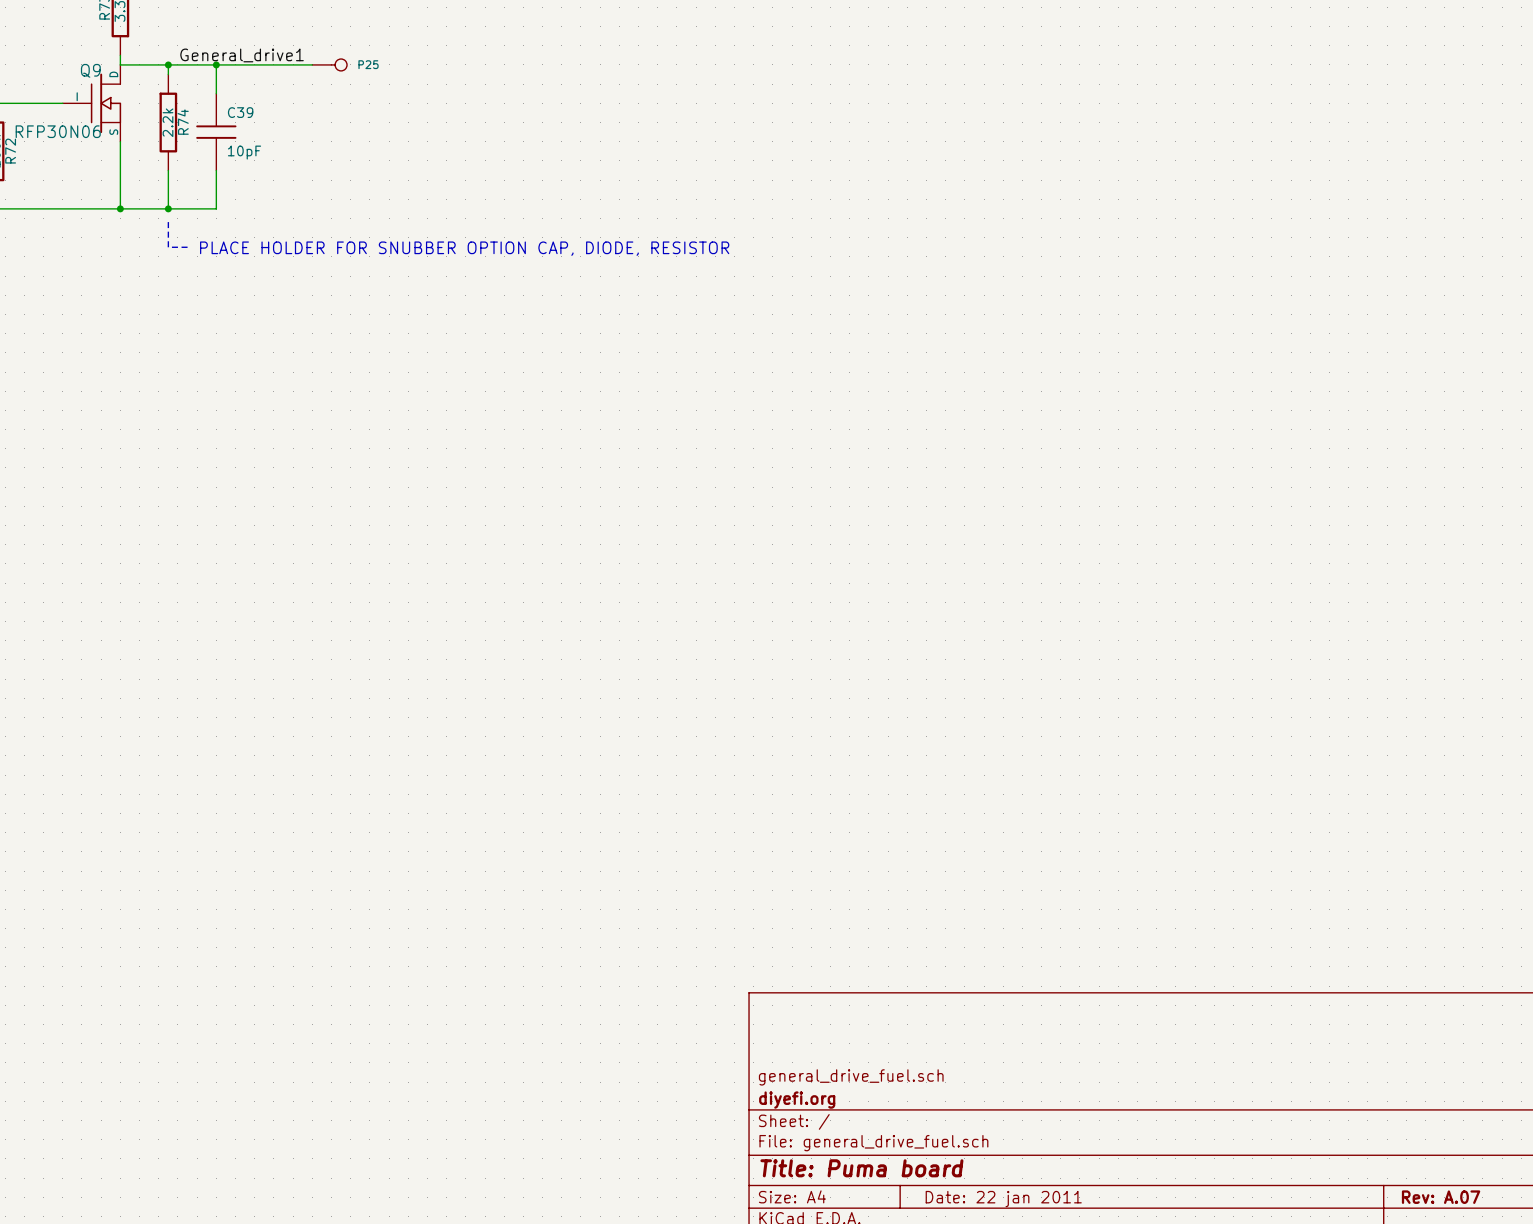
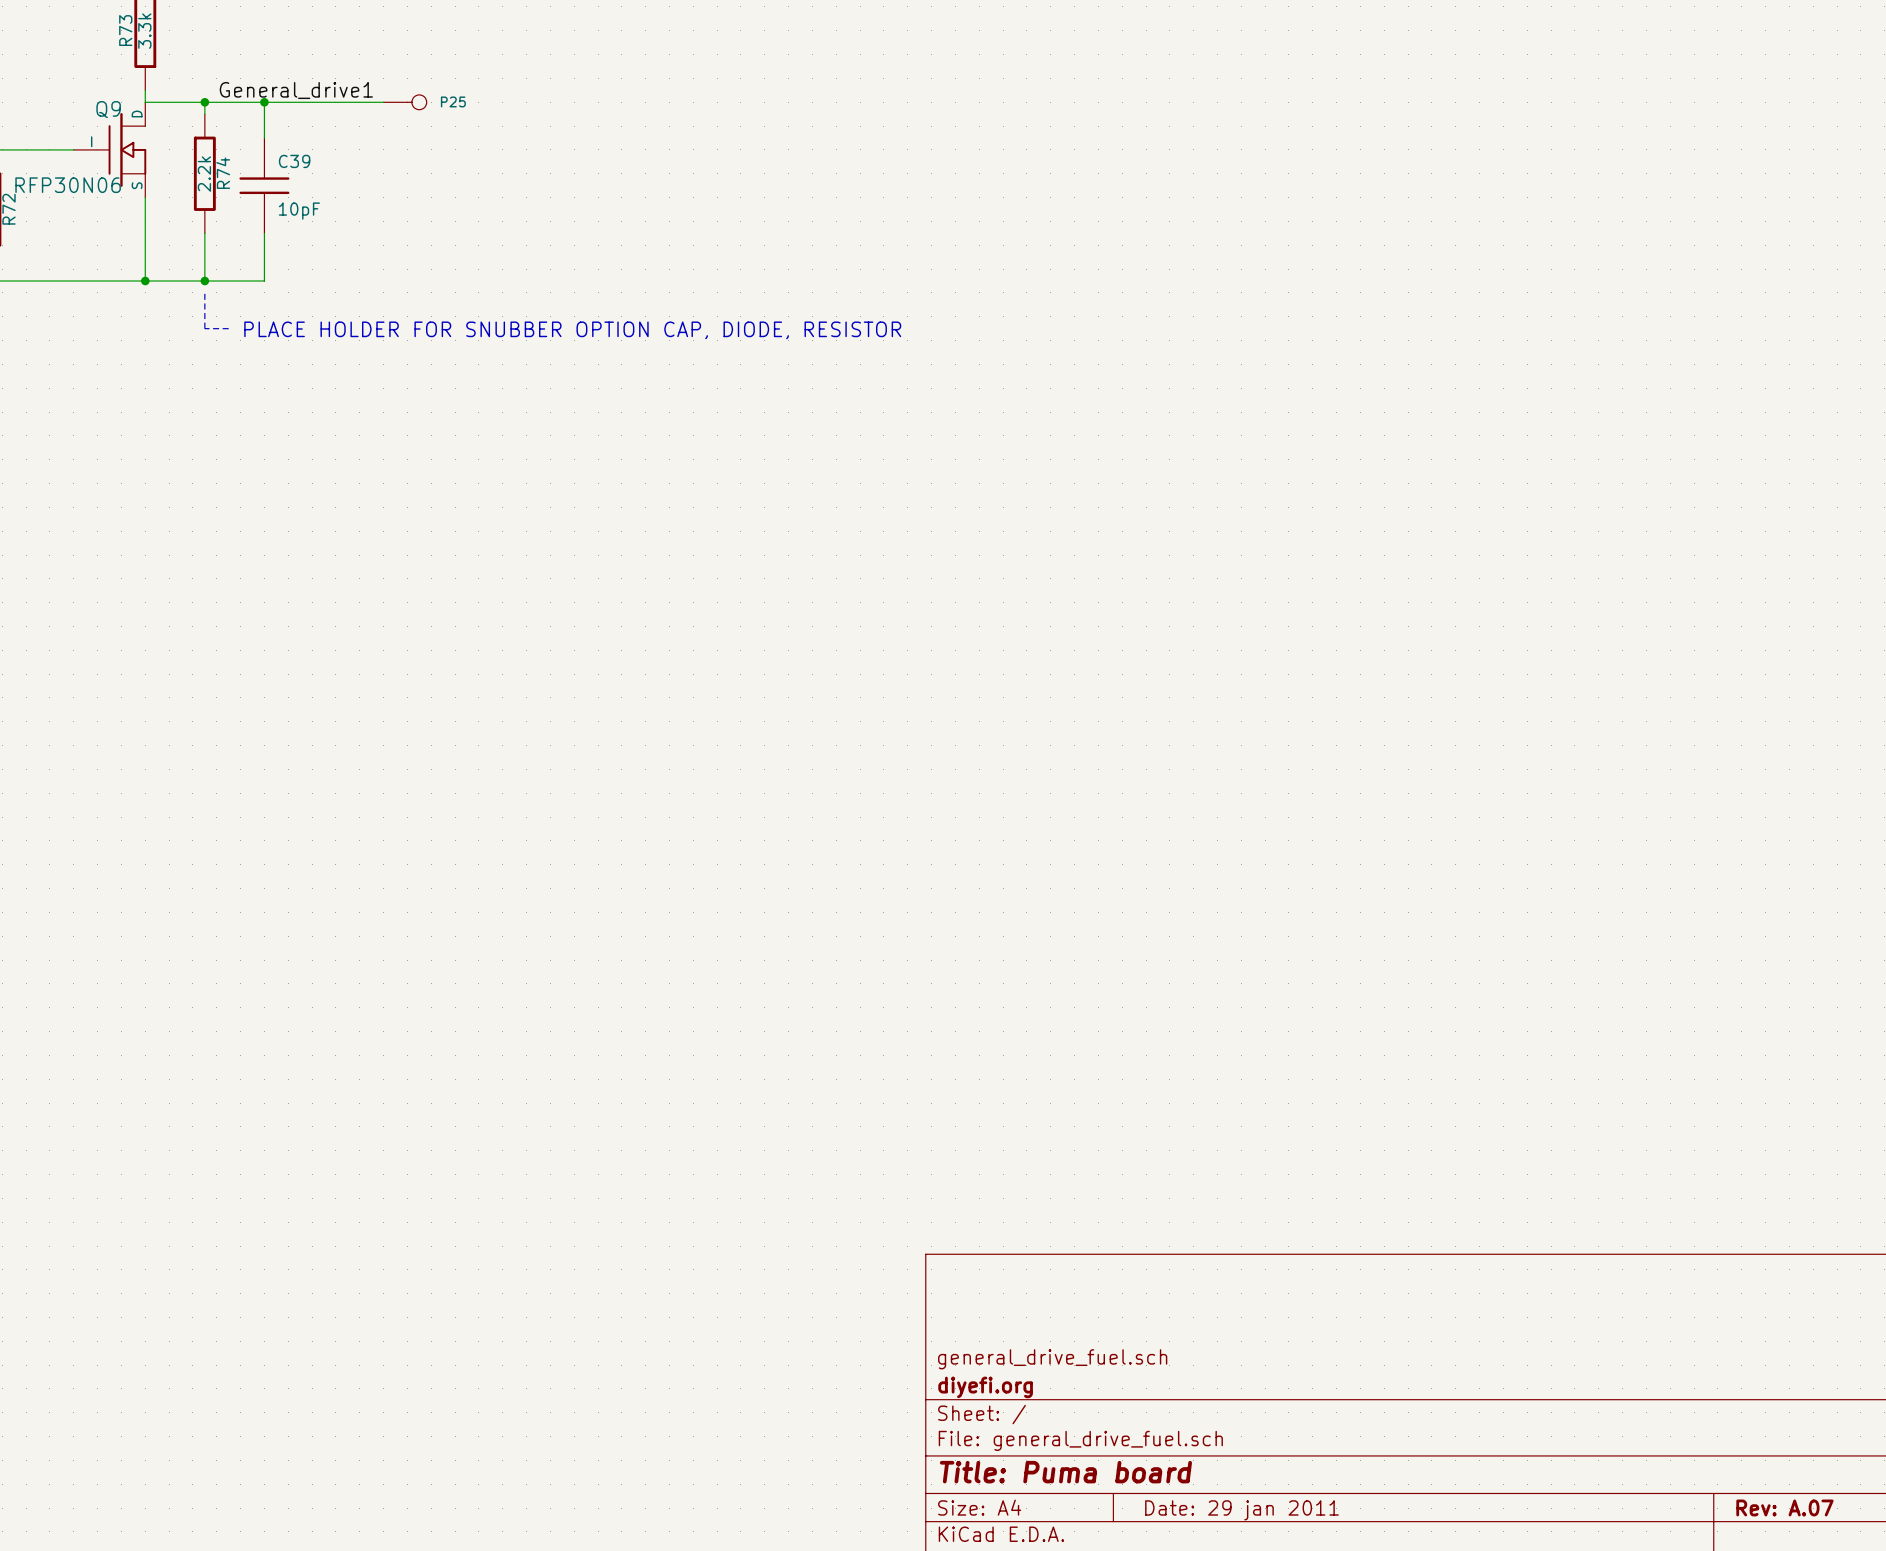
title block: Date: 22 jan 2011 (1003, 1199) -> Date: 29 jan 2011 (1241, 1510)

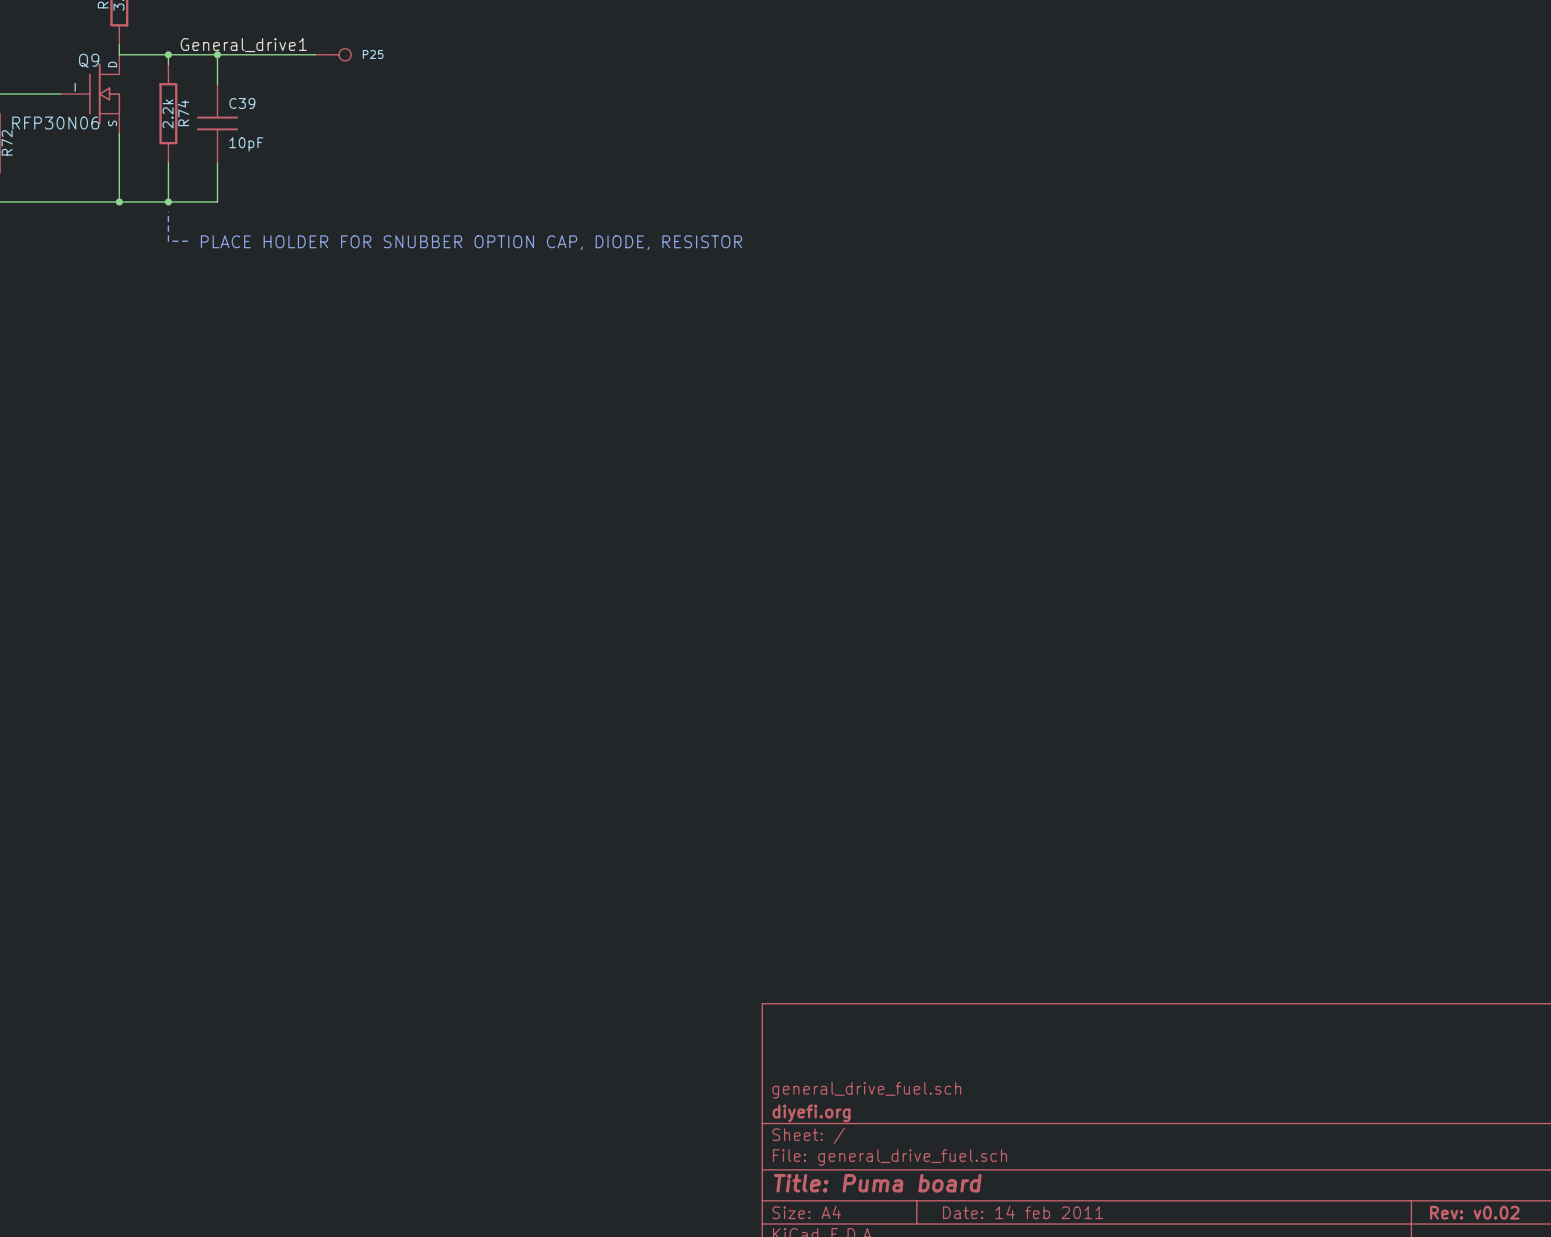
title block: Rev: A.07 (1784, 1507) -> Rev: v0.02 (1474, 1212)
title block: Date: 29 jan 2011 (1241, 1510) -> Date: 14 feb 2011 (1023, 1212)

